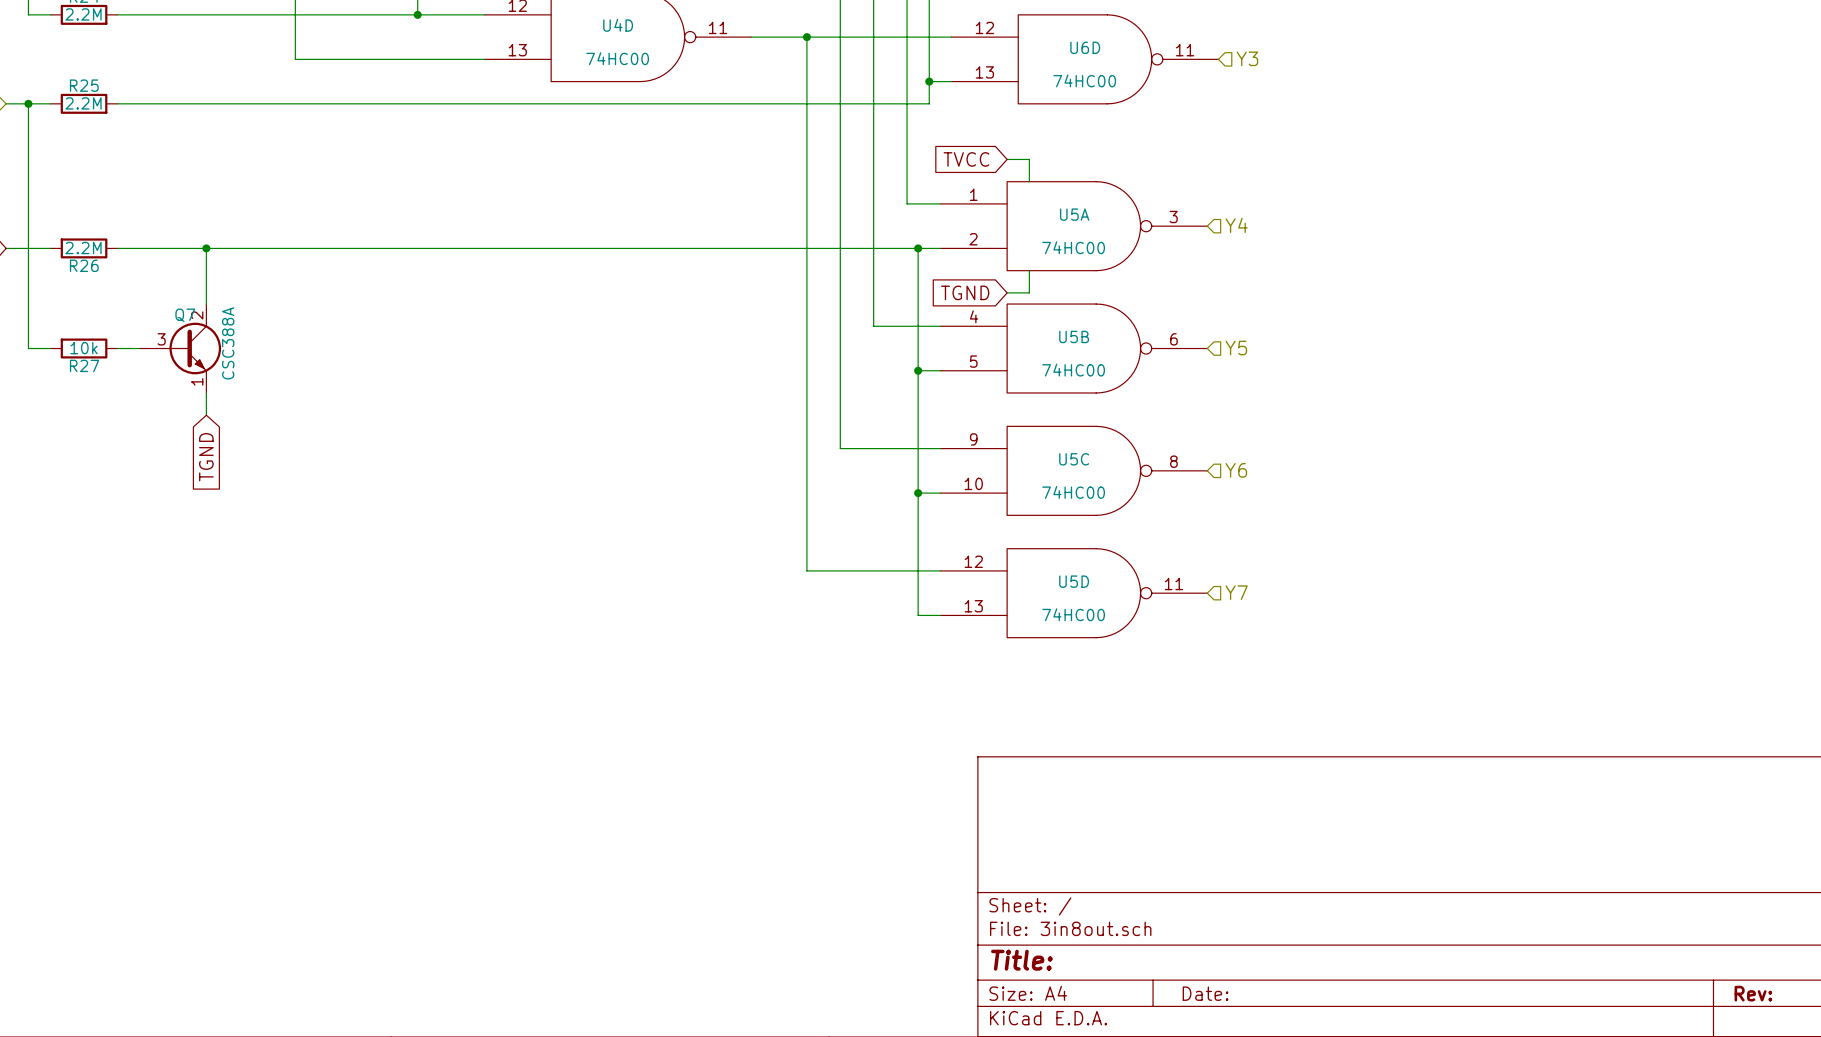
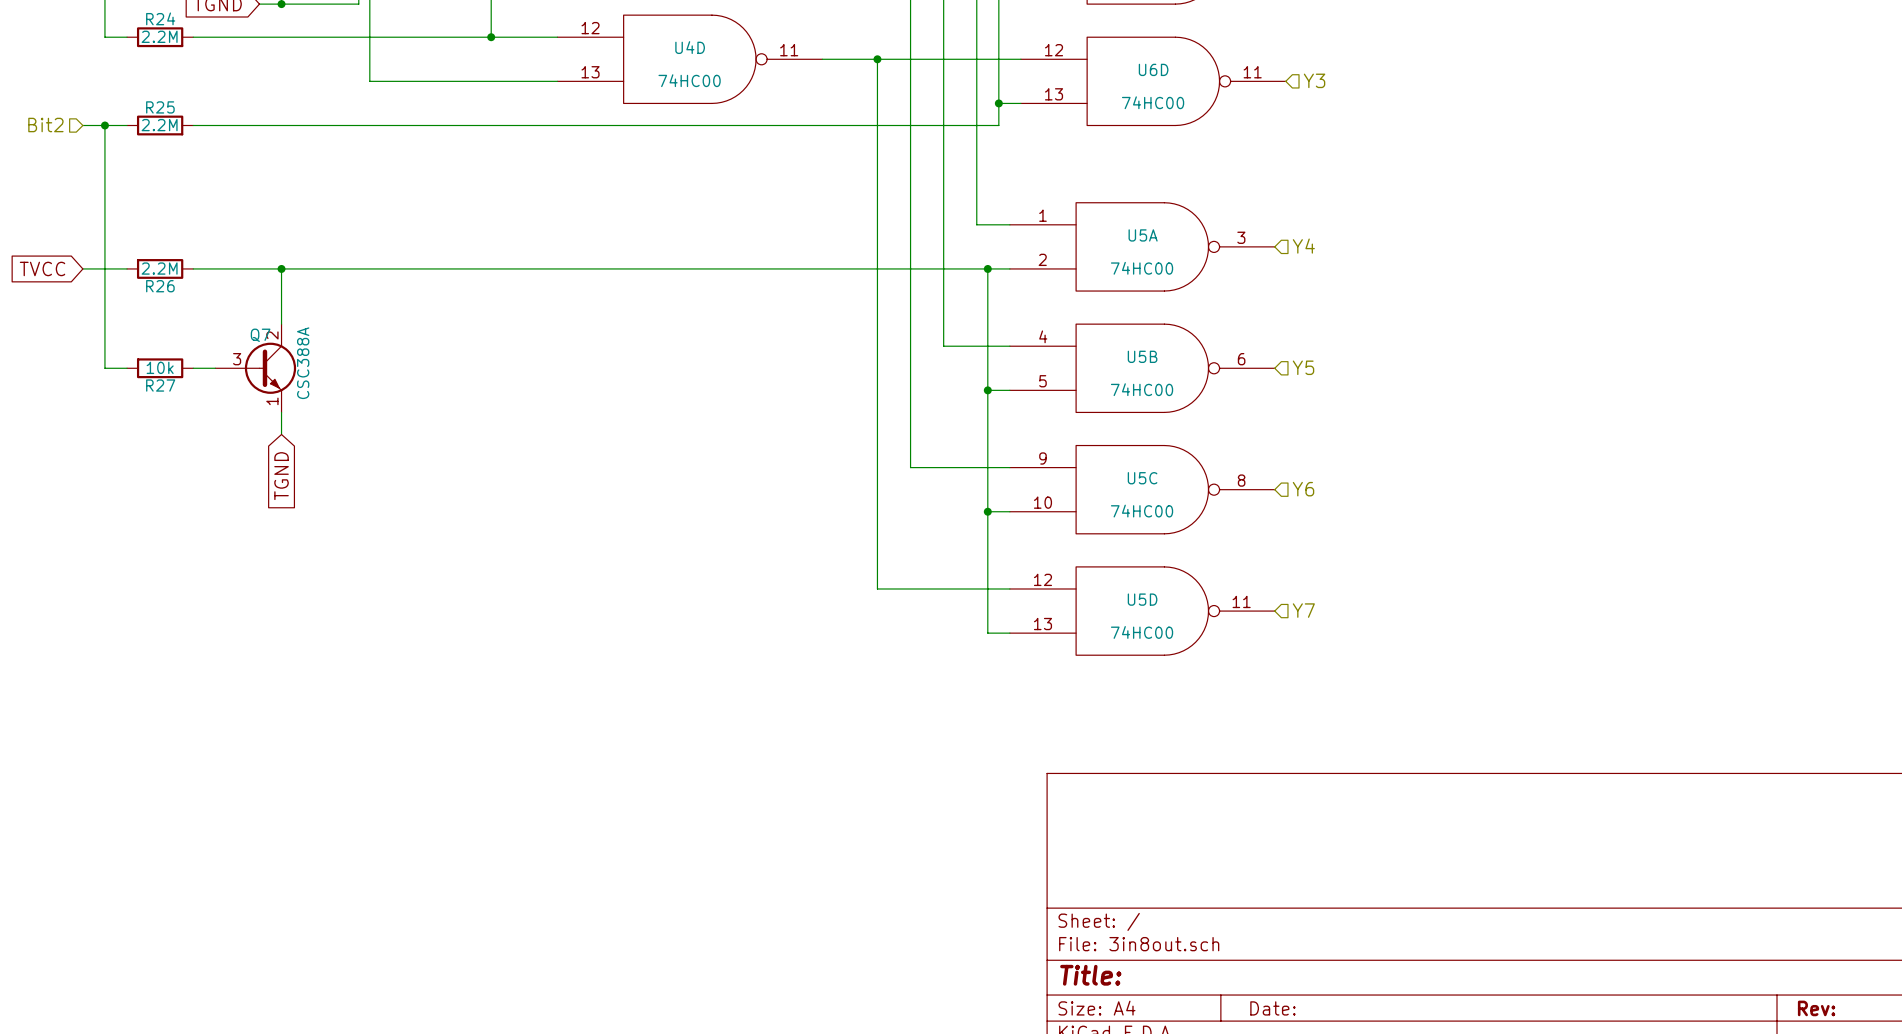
global label: TVCC (966, 159) -> none
wire: (1007, 159) (1029, 159) (1029, 181) -> none
wire: (1029, 270) (1029, 292) (1007, 292) -> none
global label: TGND (965, 292) -> none

